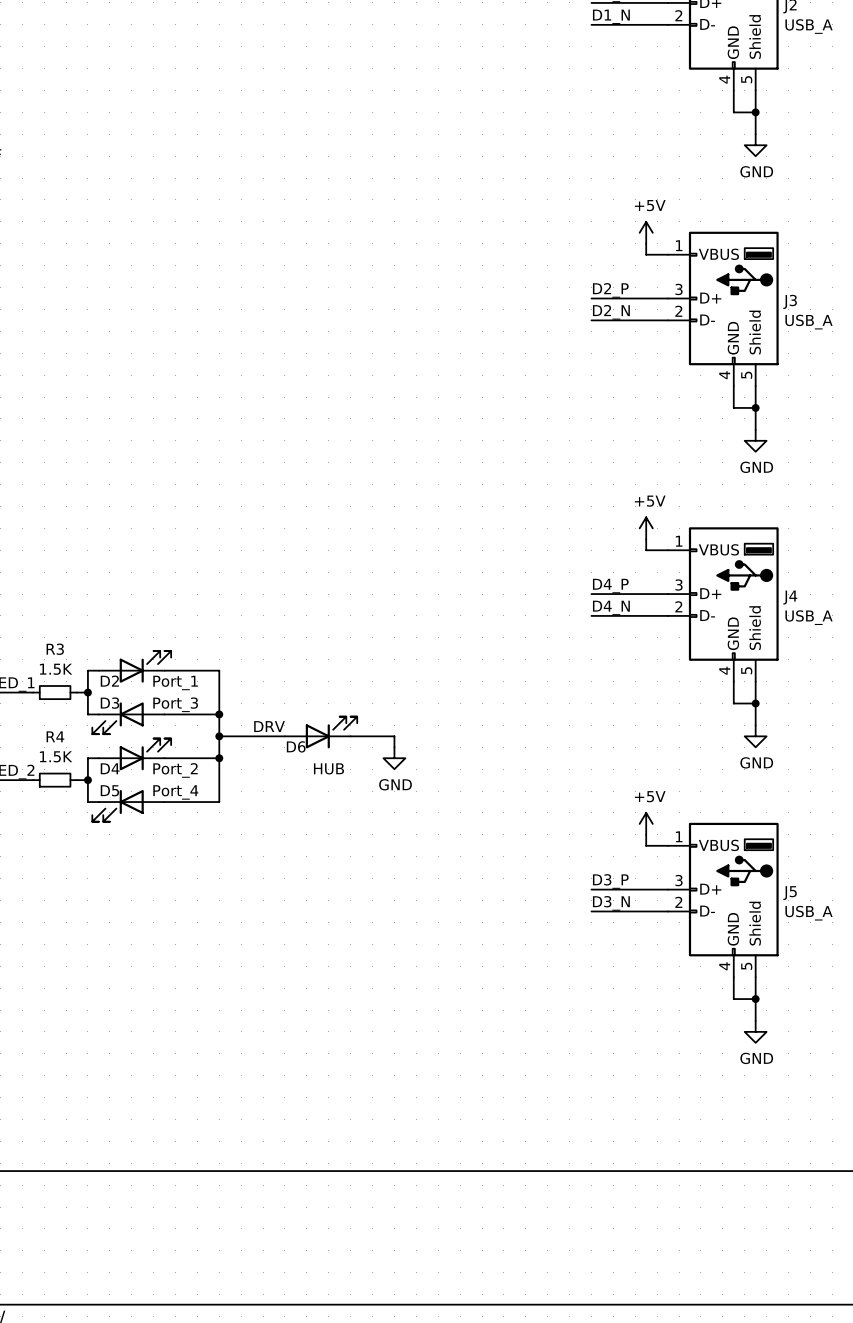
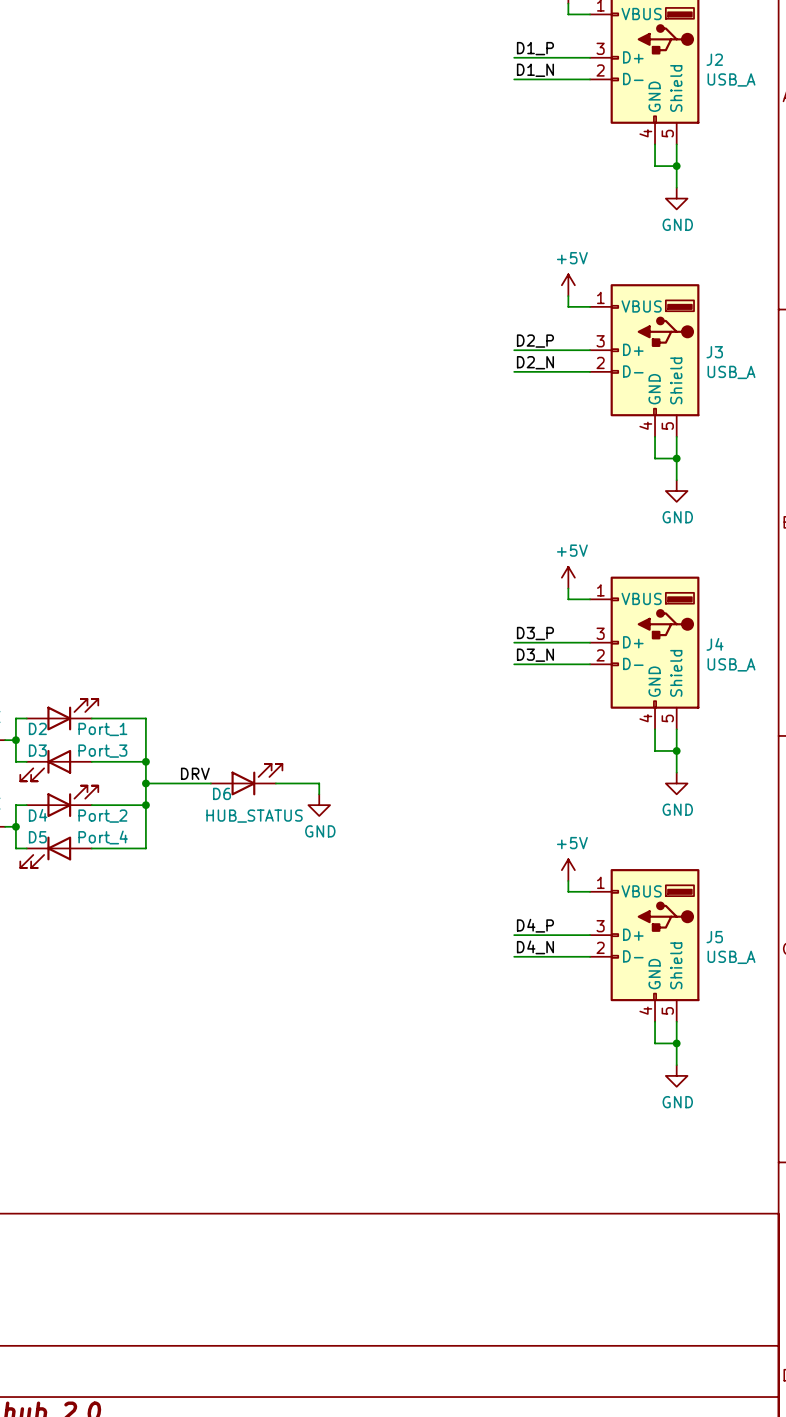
label: D4_P (610, 586) -> D3_P (535, 633)
label: D4_N (611, 607) -> D3_N (535, 655)
D6 value: HUB (328, 768) -> HUB_STATUS (254, 816)
label: D3_P (610, 881) -> D4_P (535, 925)
label: D3_N (611, 903) -> D4_N (535, 947)

